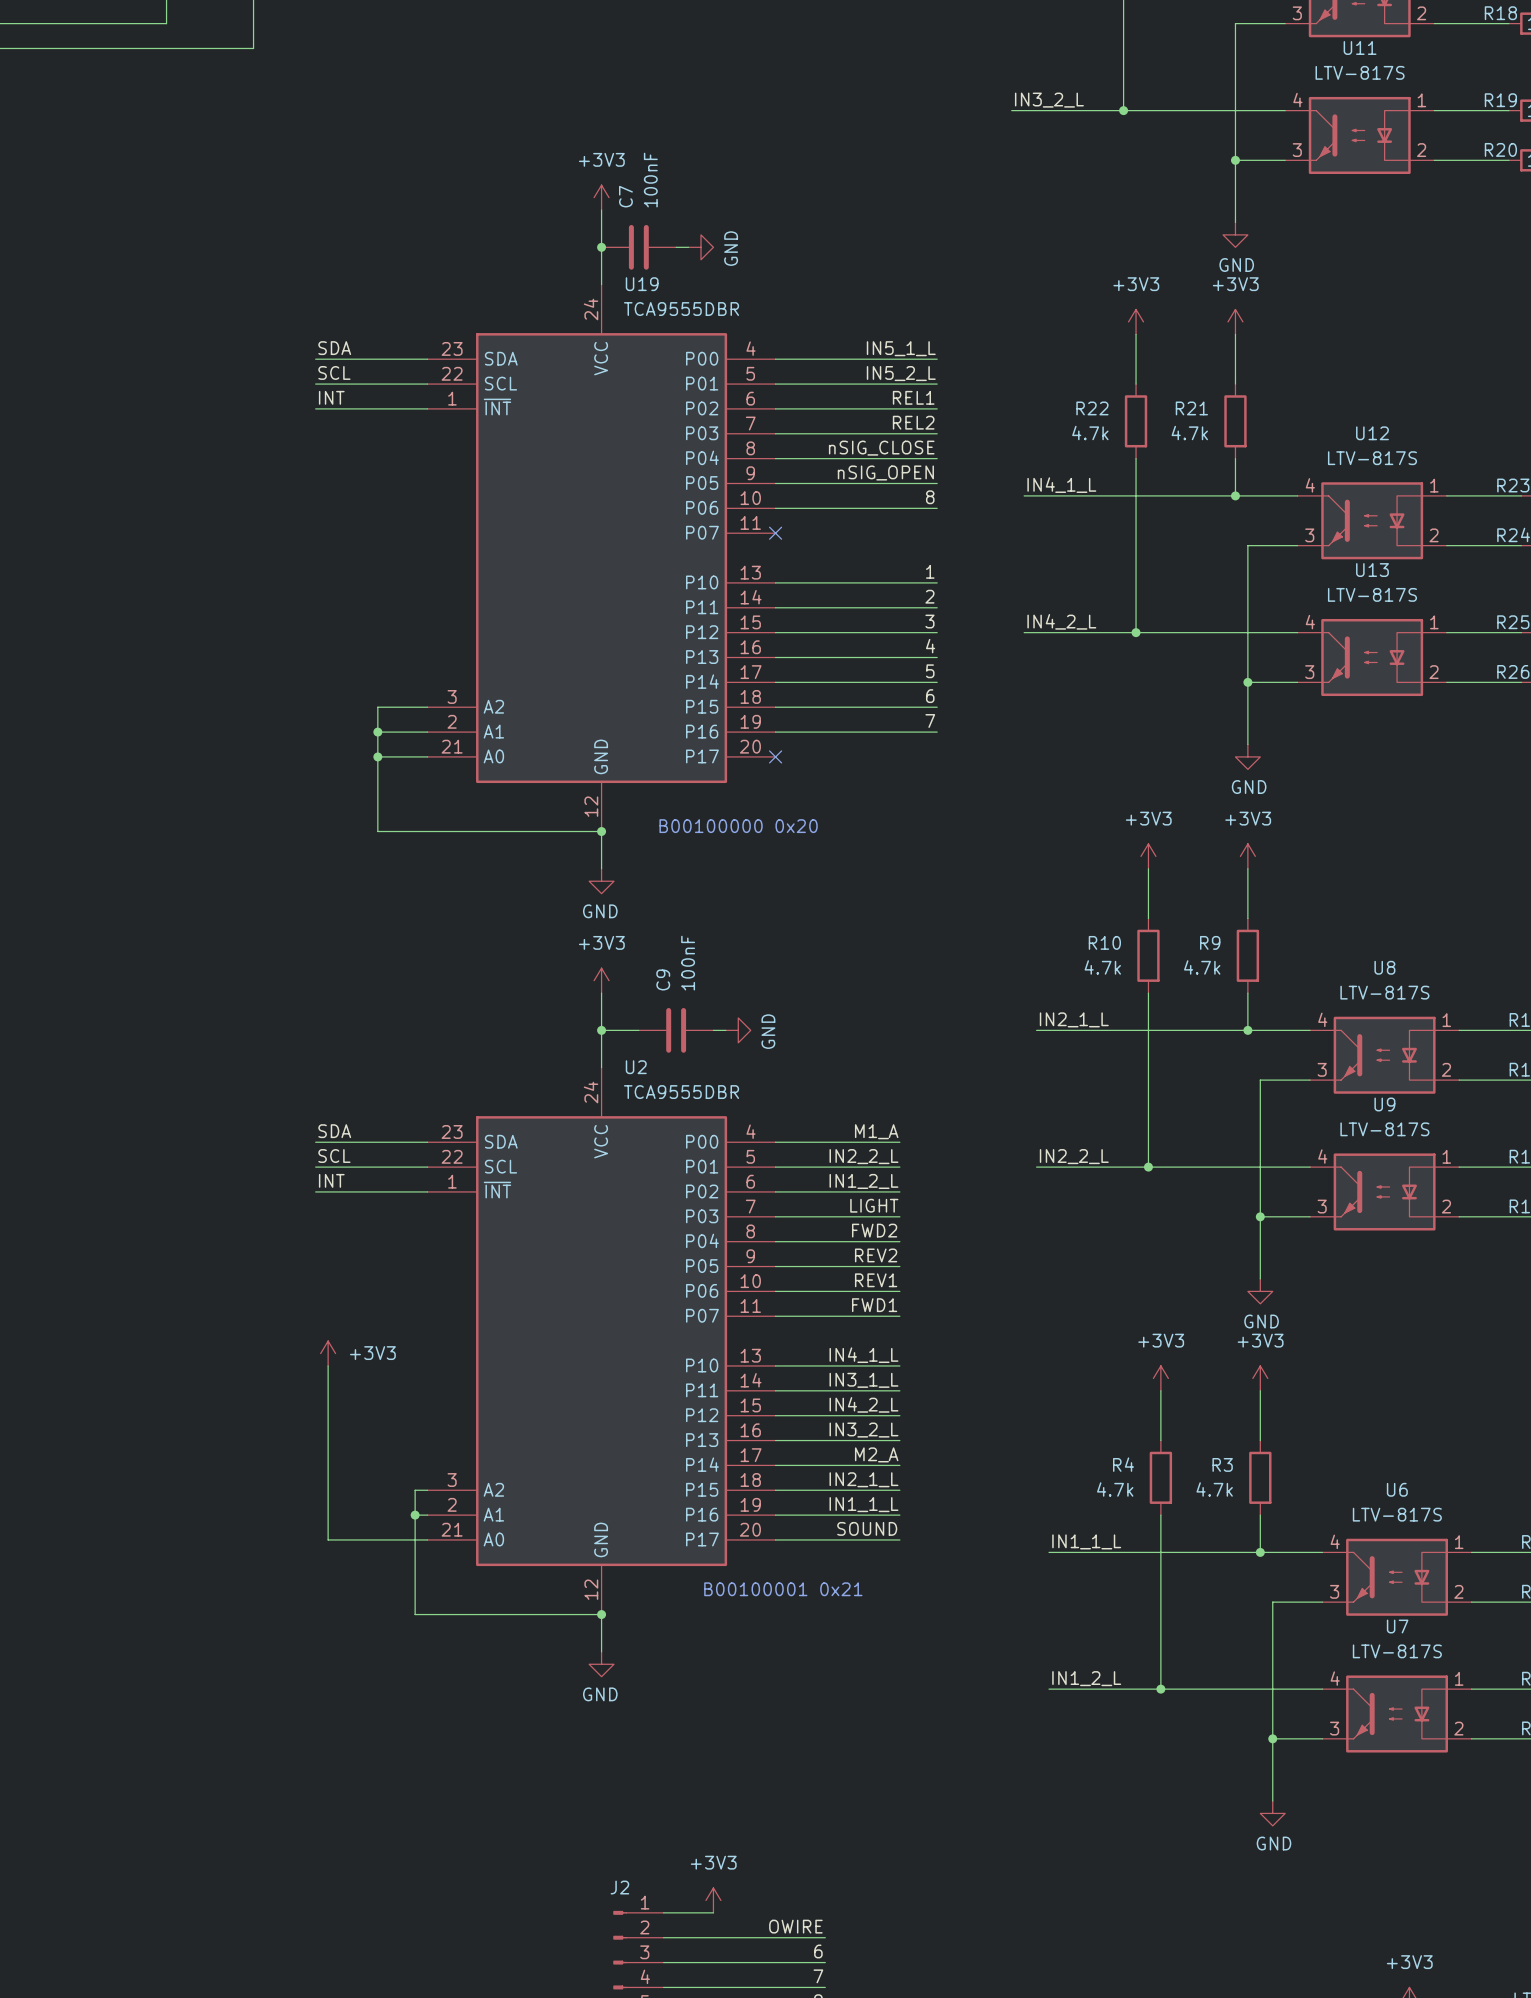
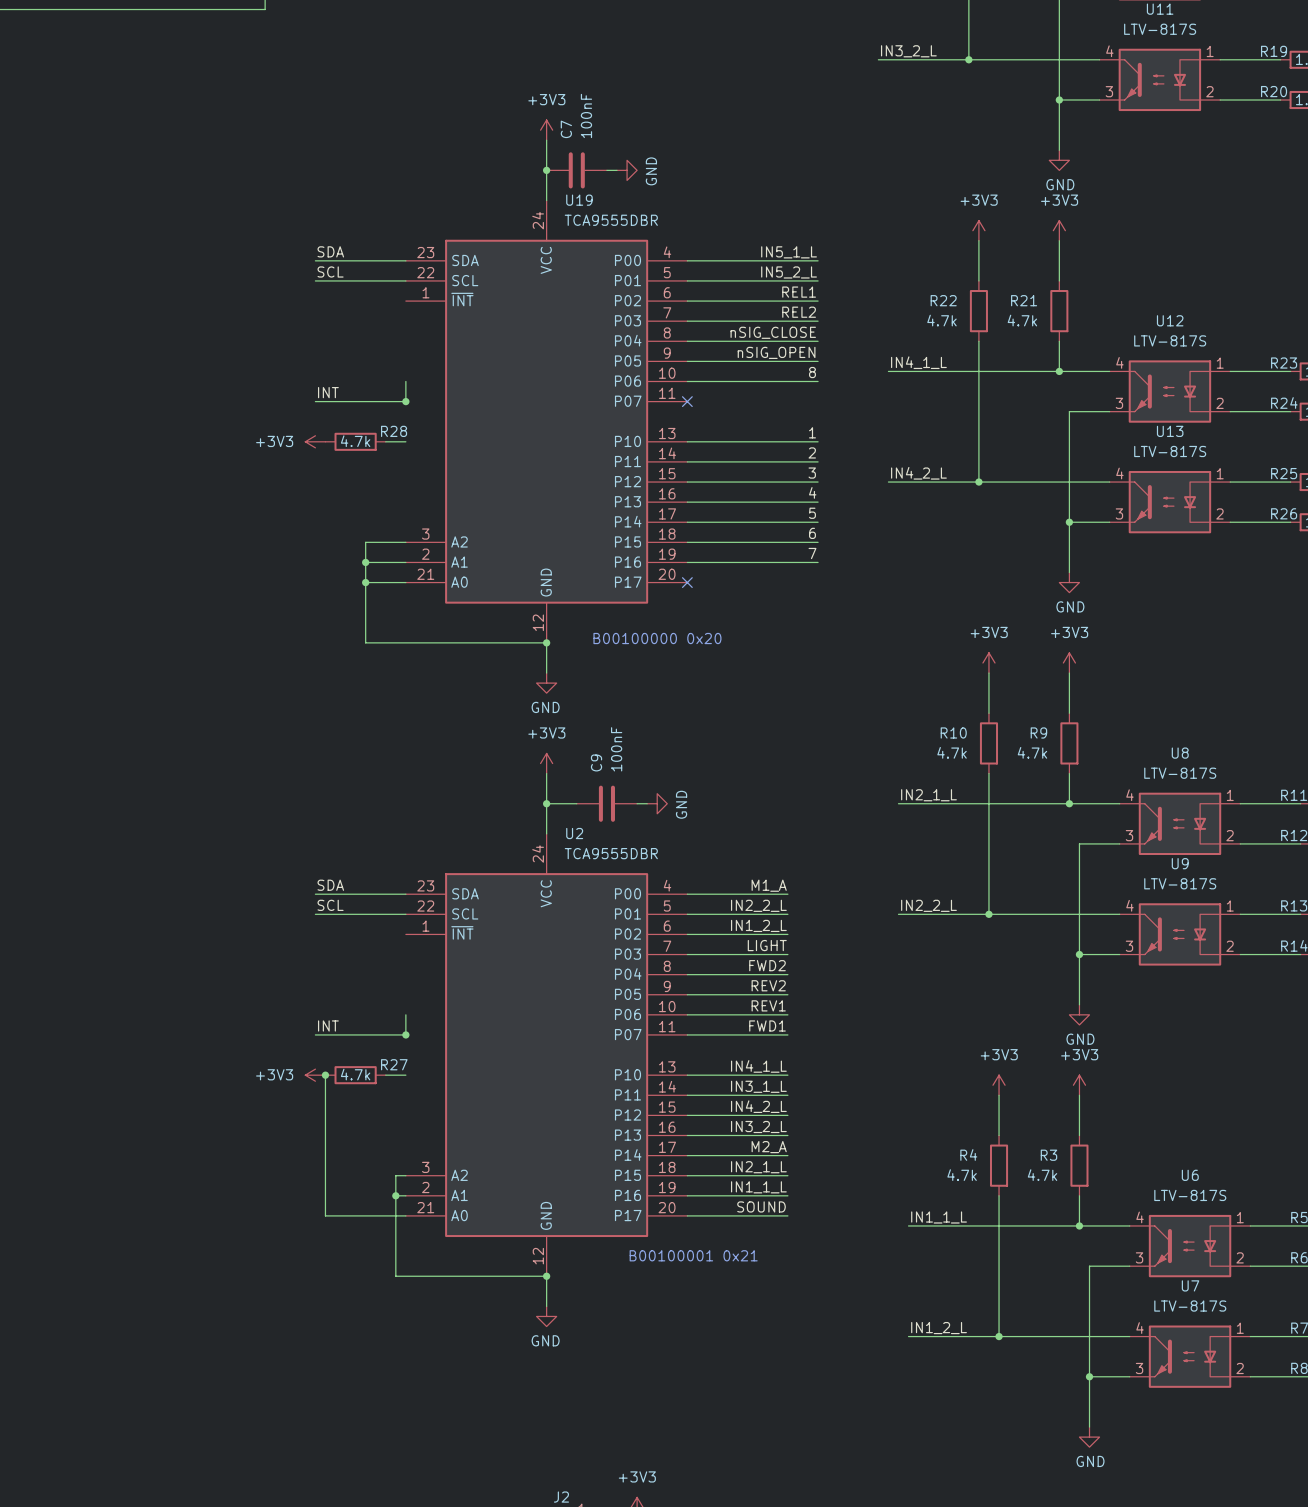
label position: INT (331, 397) -> INT (328, 392)
wire: (315, 408) (427, 408) -> none
wire: none -> (405, 381) (405, 401) (315, 401)
junction: none -> (405, 401)
power symbol: none -> +3V3 (315, 441)
R28: none -> (355, 441)
wire: none -> (385, 441) (405, 441)
label position: INT (331, 1180) -> INT (328, 1025)
wire: (315, 1191) (427, 1191) -> none
wire: none -> (405, 1014) (405, 1034) (315, 1034)
junction: none -> (405, 1034)
power symbol rotation: 0° (328, 1353) -> 90° counterclockwise (315, 1075)
power symbol position: +3V3 (328, 1353) -> +3V3 (315, 1075)
power symbol text position: +3V3 (372, 1353) -> +3V3 (274, 1074)
junction: none -> (325, 1075)
R27: none -> (355, 1075)
wire: none -> (385, 1075) (405, 1075)

